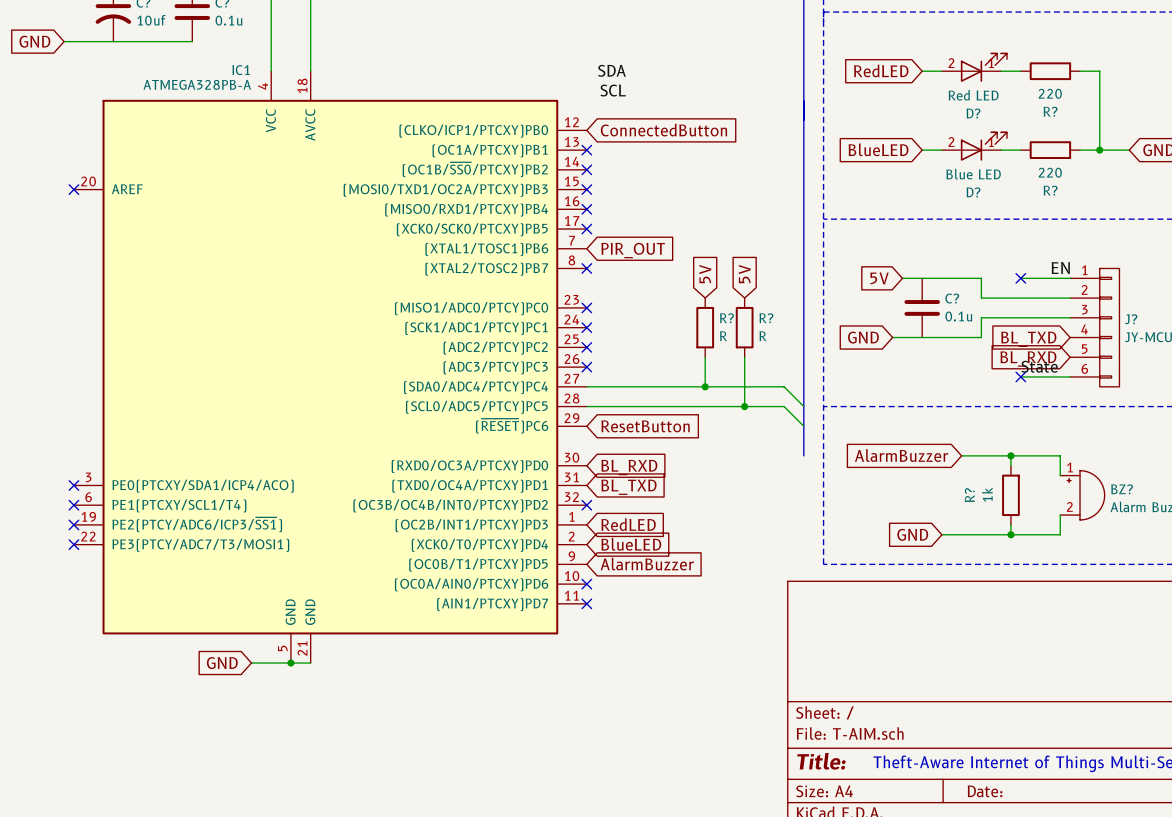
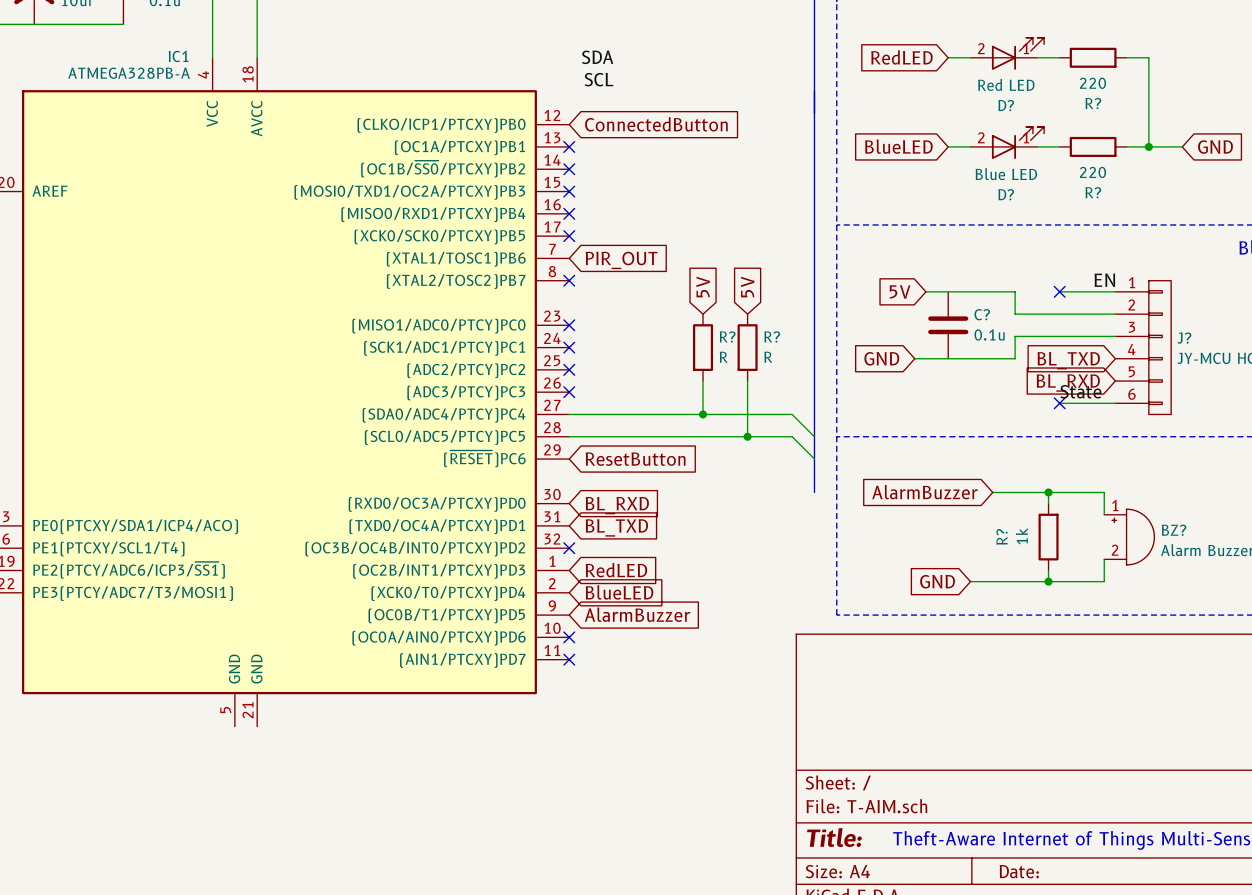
global label: GND (222, 663) -> none
wire: (251, 663) (310, 663) -> none
junction: (290, 663) -> none

